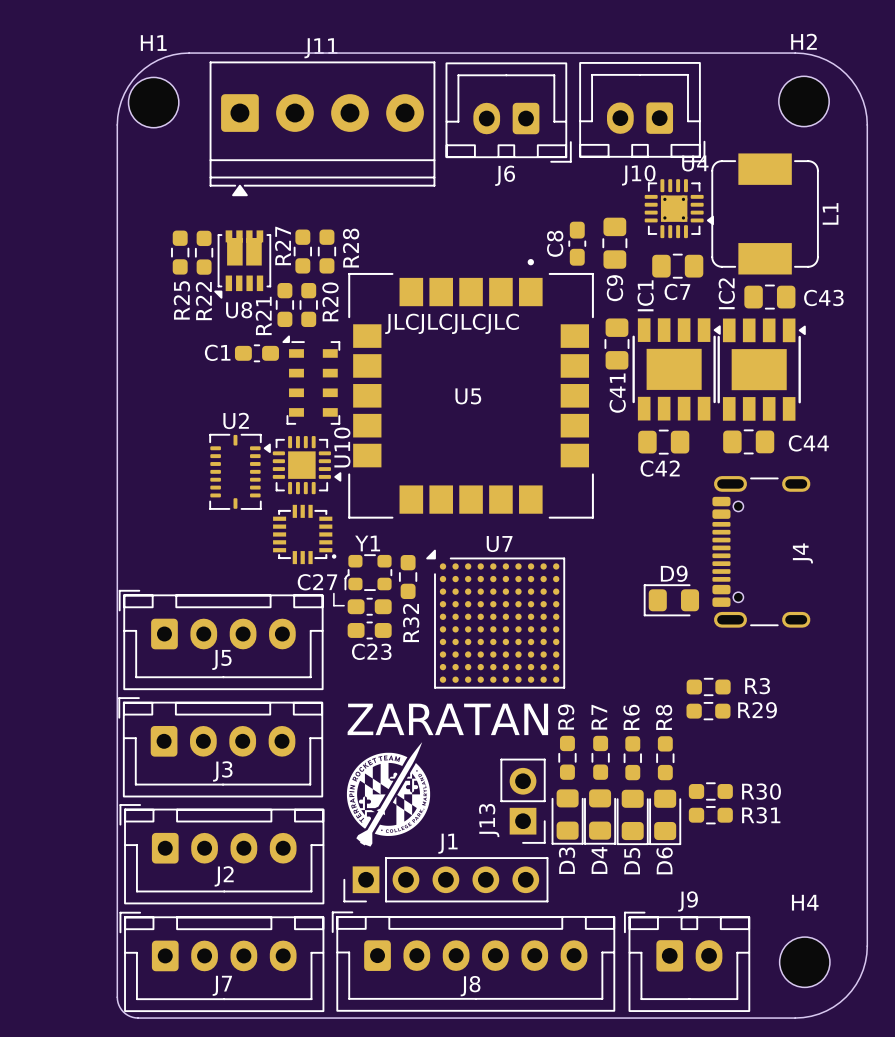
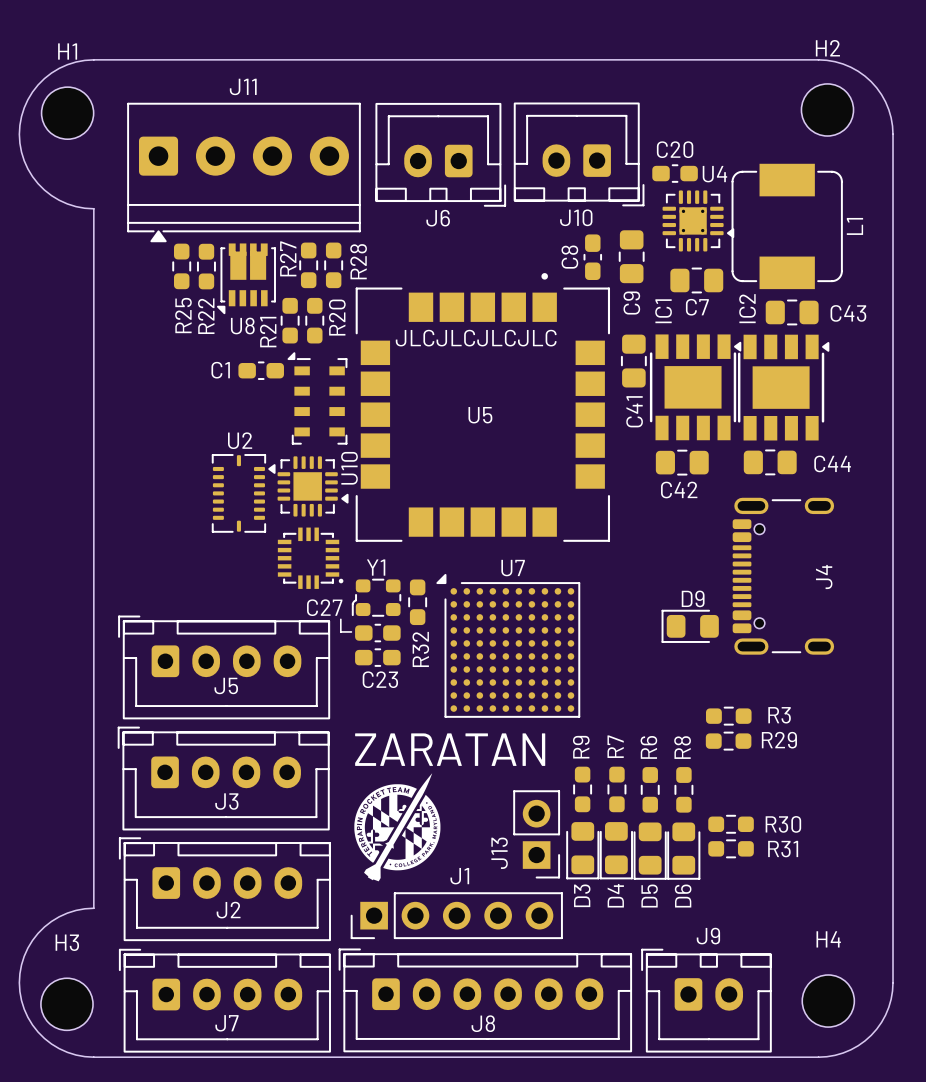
board edge: (189, 53) (165, 57) (144, 68) (133, 80) (124, 93) (117, 116) (117, 997) (121, 1009) (127, 1015) (138, 1018) (803, 1017) (819, 1014) (833, 1007) (851, 990) (863, 969) (867, 944) -> (191, 59) (93, 59) (67, 64) (51, 73) (38, 84) (24, 107) (19, 125) (19, 143) (24, 160) (38, 183) (51, 195) (67, 203) (93, 208) (93, 908) (76, 910) (59, 916) (38, 933) (27, 948) (19, 973) (19, 991) (24, 1009) (32, 1025) (44, 1038) (59, 1048) (76, 1055) (93, 1057) (818, 1057) (835, 1055) (850, 1049) (871, 1035) (881, 1022) (888, 1007) (893, 982)
H1 position: (153, 102) -> (67, 113)
J6 position: (508, 112) -> (440, 154)
J10 position: (642, 112) -> (579, 154)
J11 position: (322, 128) -> (243, 172)
C20: none -> (675, 173)
H3: none -> (66, 1004)

